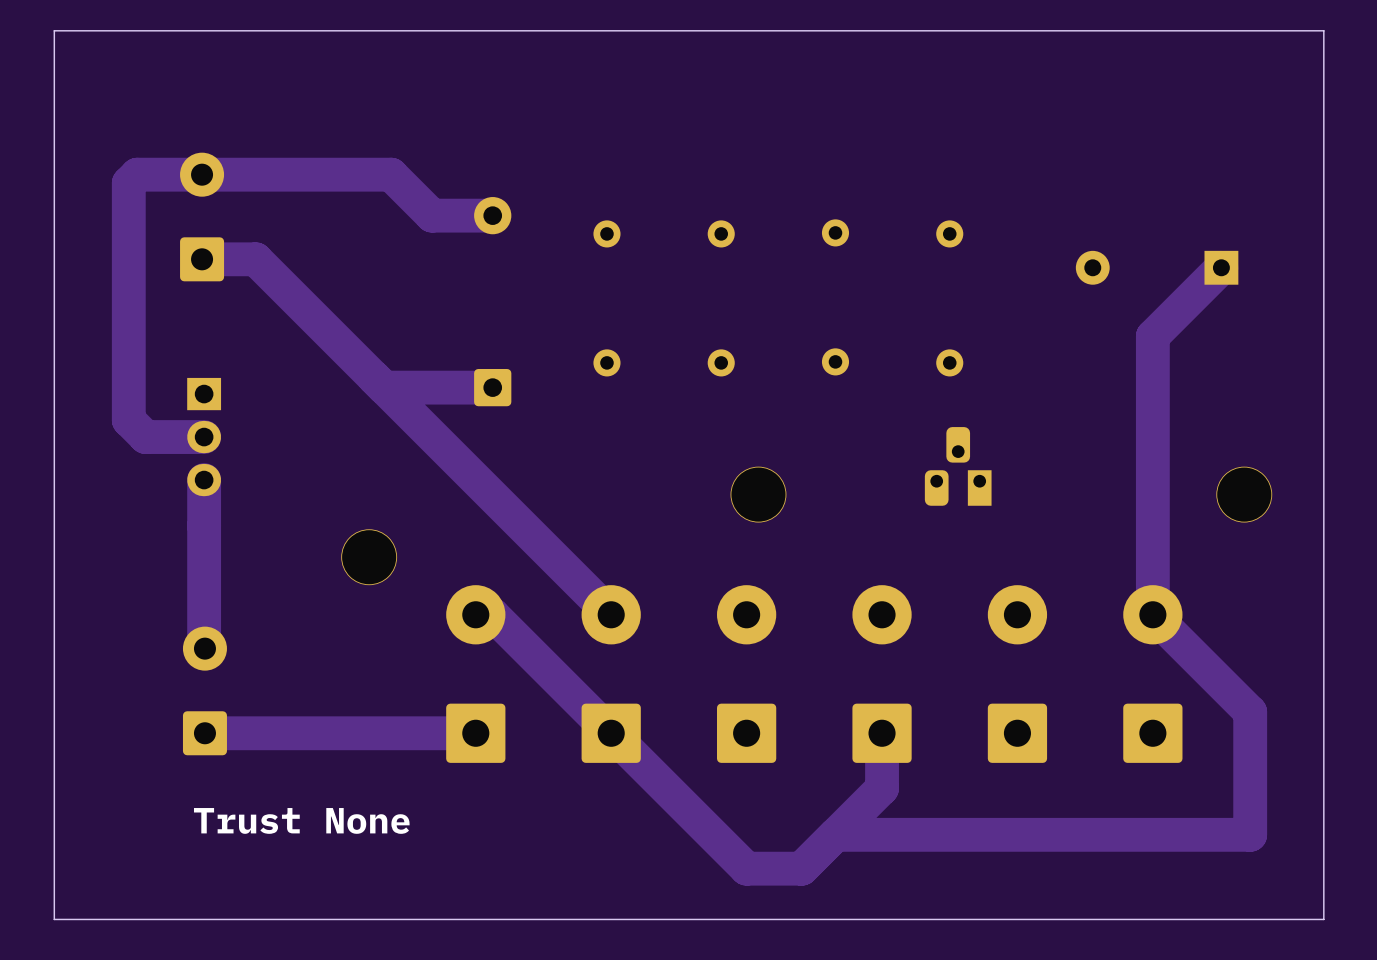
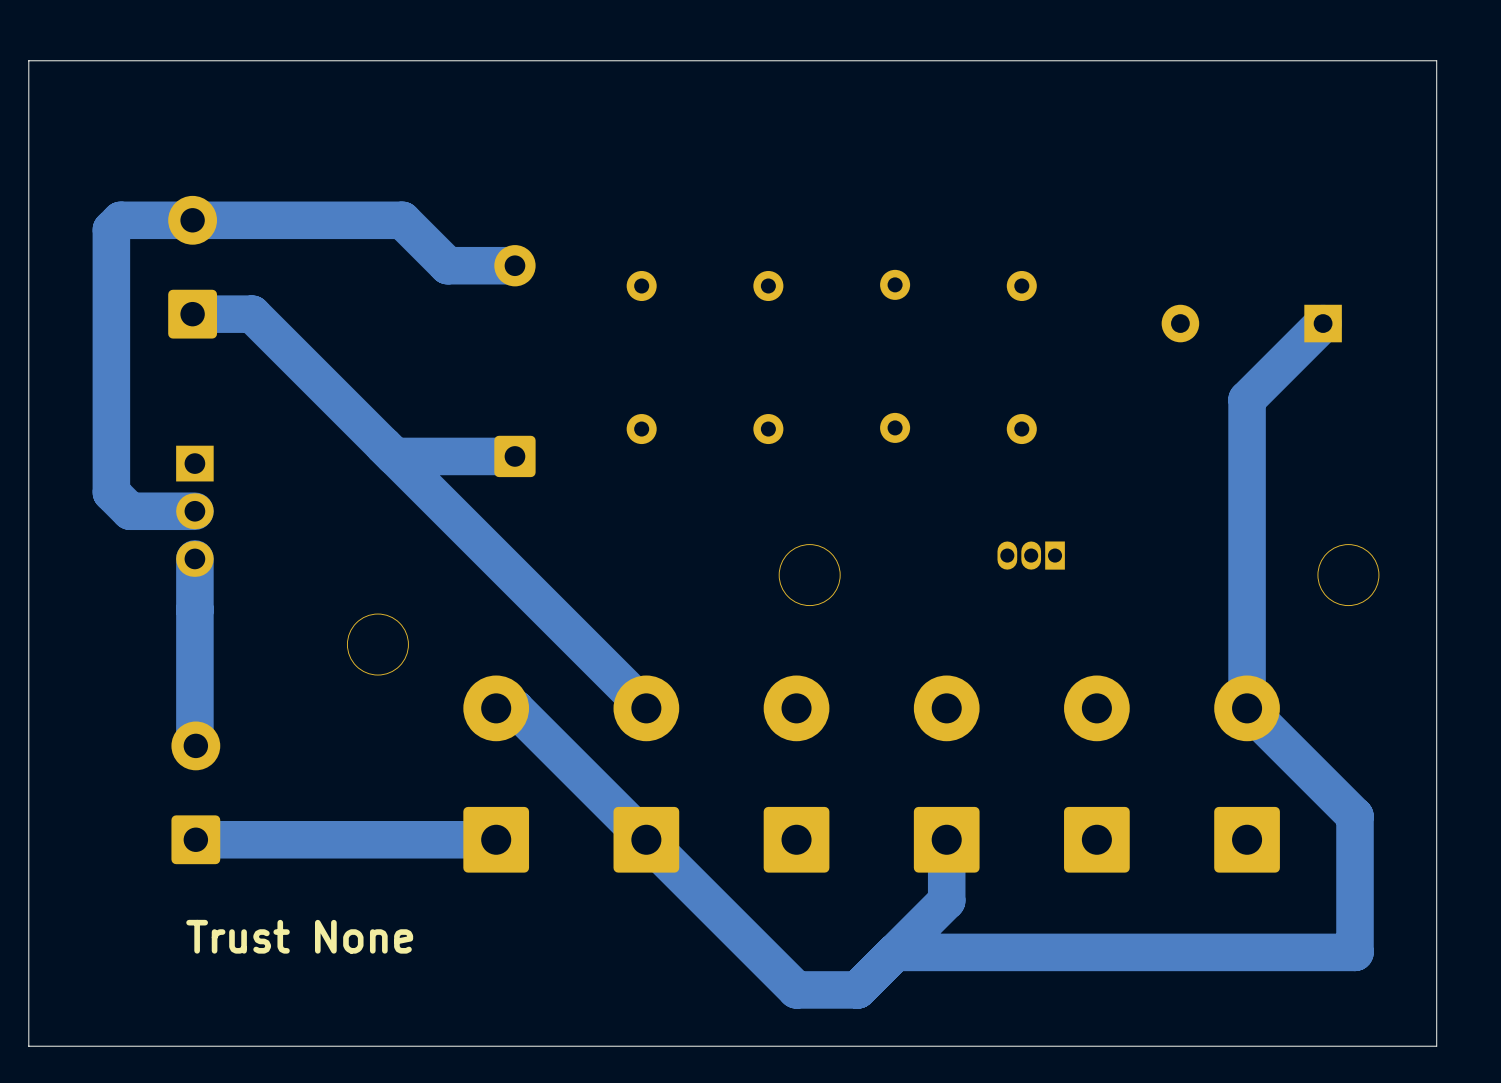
part footprint: [924, 427, 992, 506] -> [997, 541, 1065, 570]

